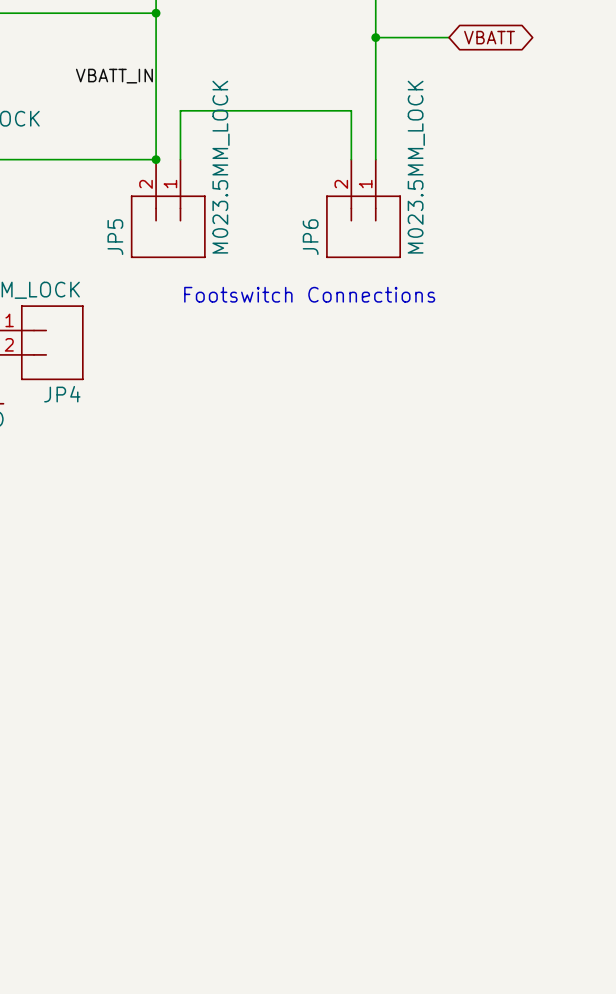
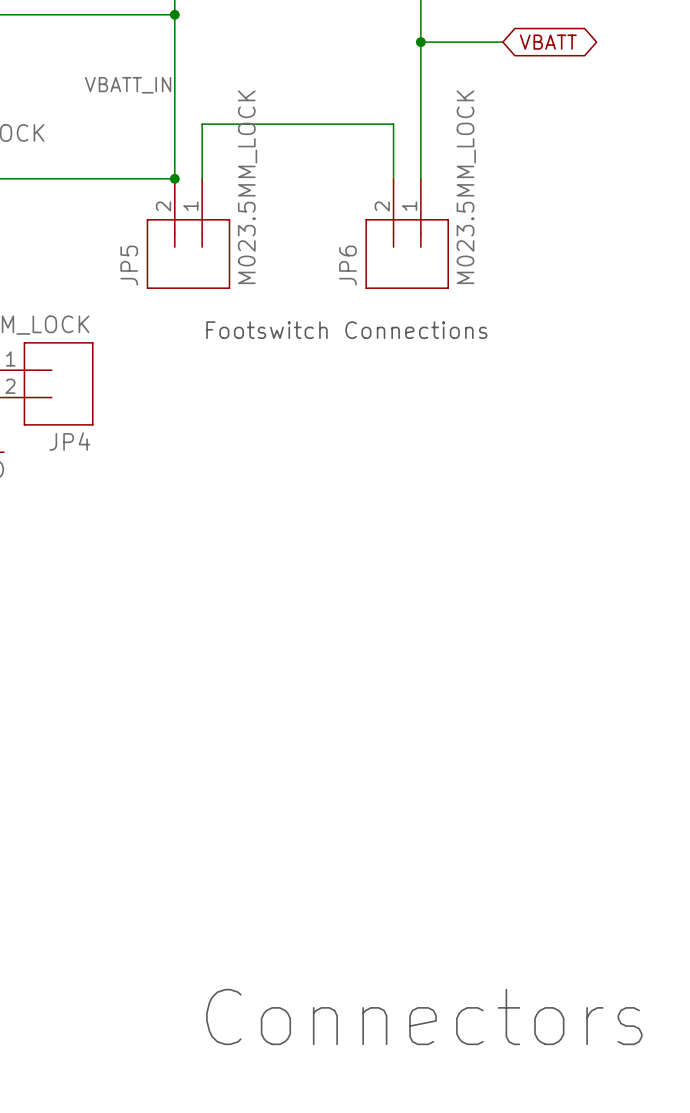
text: none -> Connectors (424, 1017)

